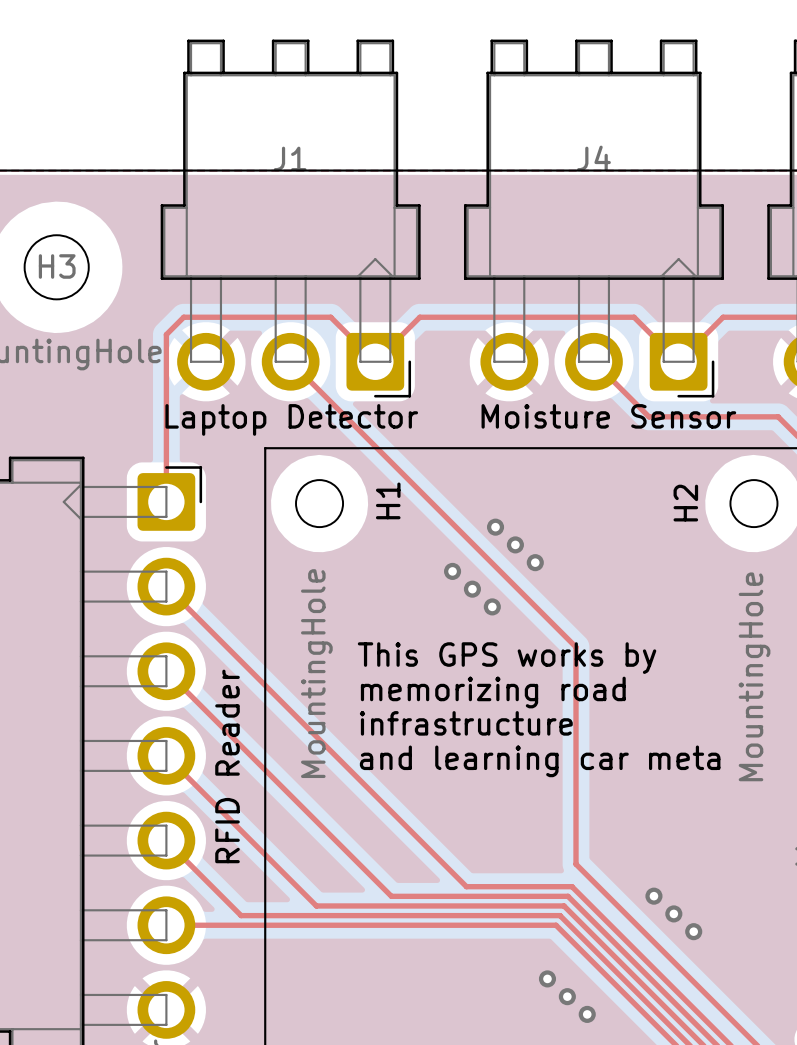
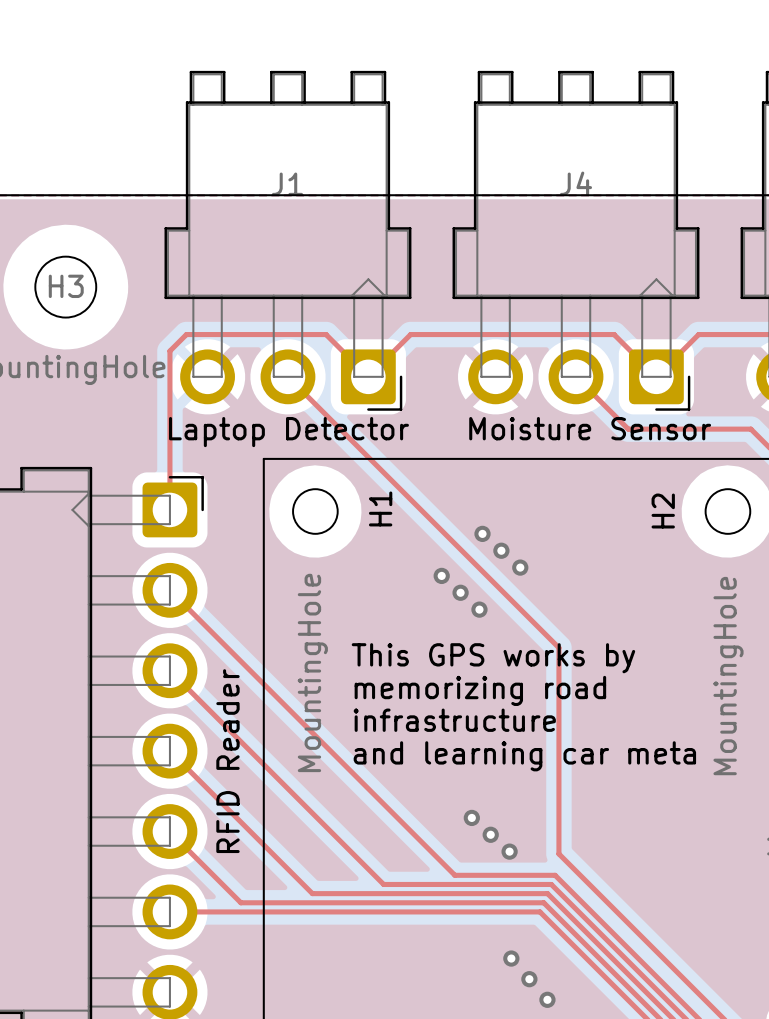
via: none -> (471, 817)
via: none -> (490, 834)
via: none -> (509, 851)
via: (653, 896) -> none
via: (673, 913) -> none
via: (693, 931) -> none
via: none -> (511, 958)
via: (547, 978) -> none
via: none -> (529, 979)
via: (567, 996) -> none
via: (587, 1014) -> none
via: none -> (547, 999)

